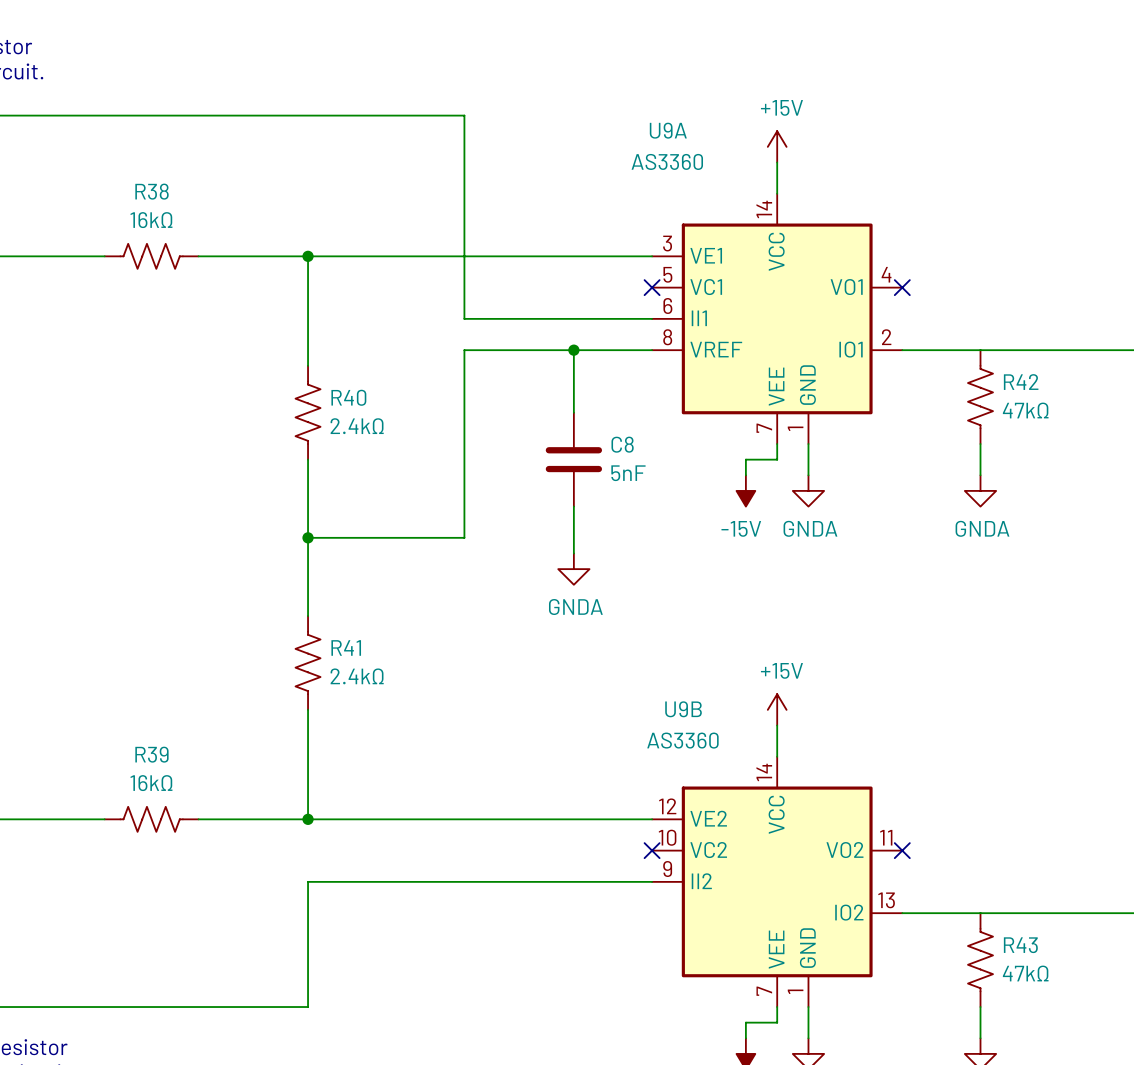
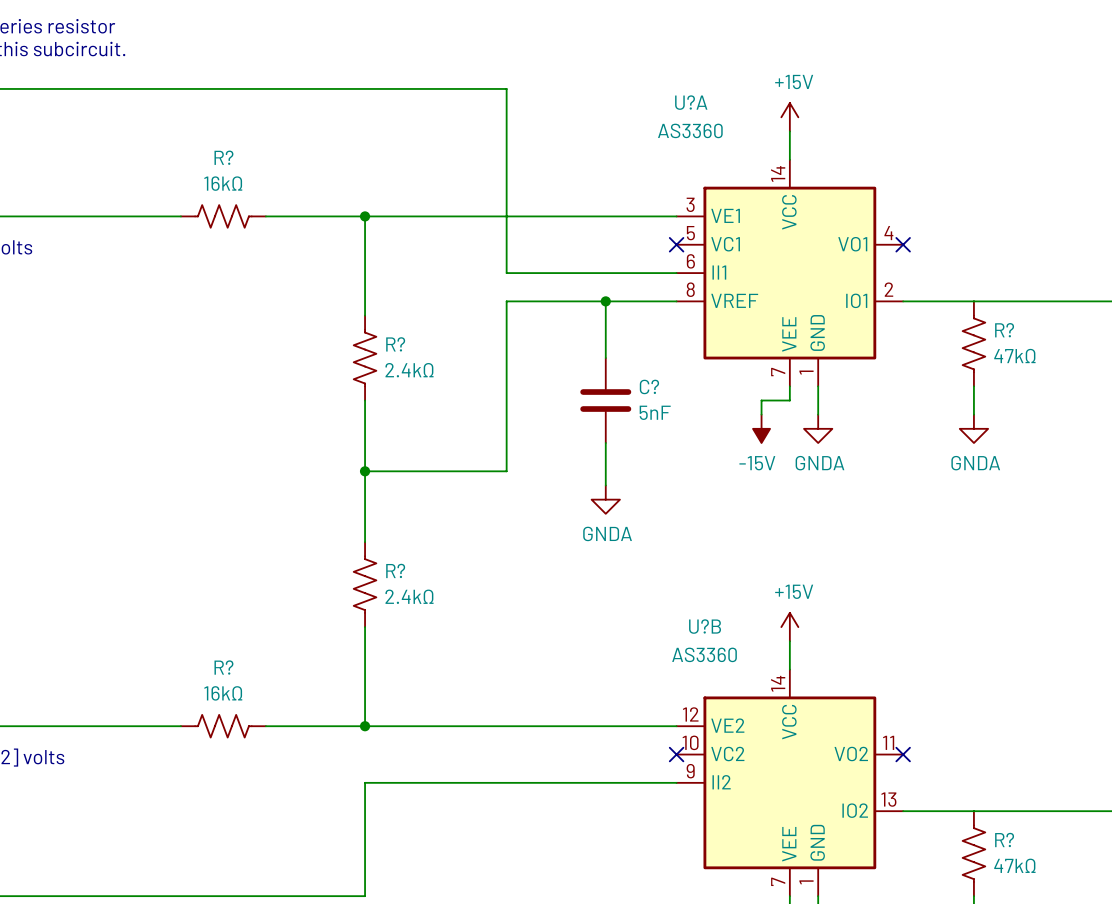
U9A name: U9A (668, 130) -> U?A (691, 102)
R38 name: R38 (152, 191) -> R? (223, 157)
R42 name: R42 (1021, 382) -> R? (1004, 330)
R40 name: R40 (348, 397) -> R? (395, 344)
C8 name: C8 (622, 444) -> C? (649, 386)
R41 name: R41 (346, 647) -> R? (395, 570)
U9B name: U9B (683, 709) -> U?B (705, 626)
R39 name: R39 (151, 754) -> R? (223, 667)
R43 name: R43 (1020, 945) -> R? (1004, 840)

